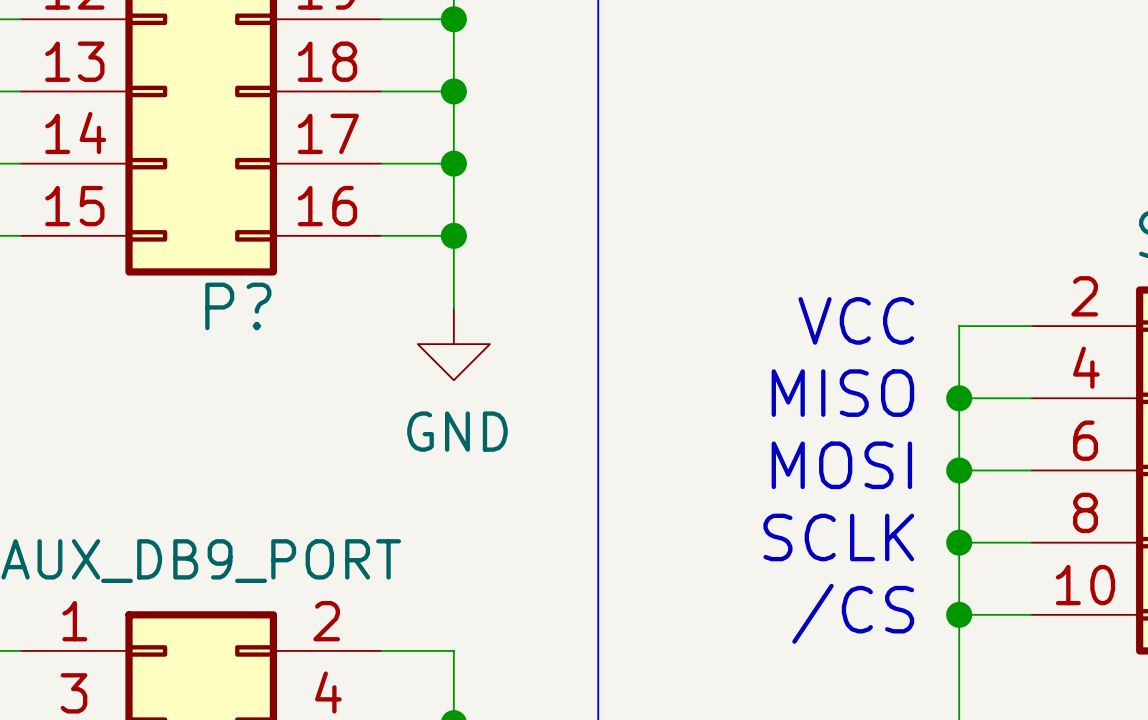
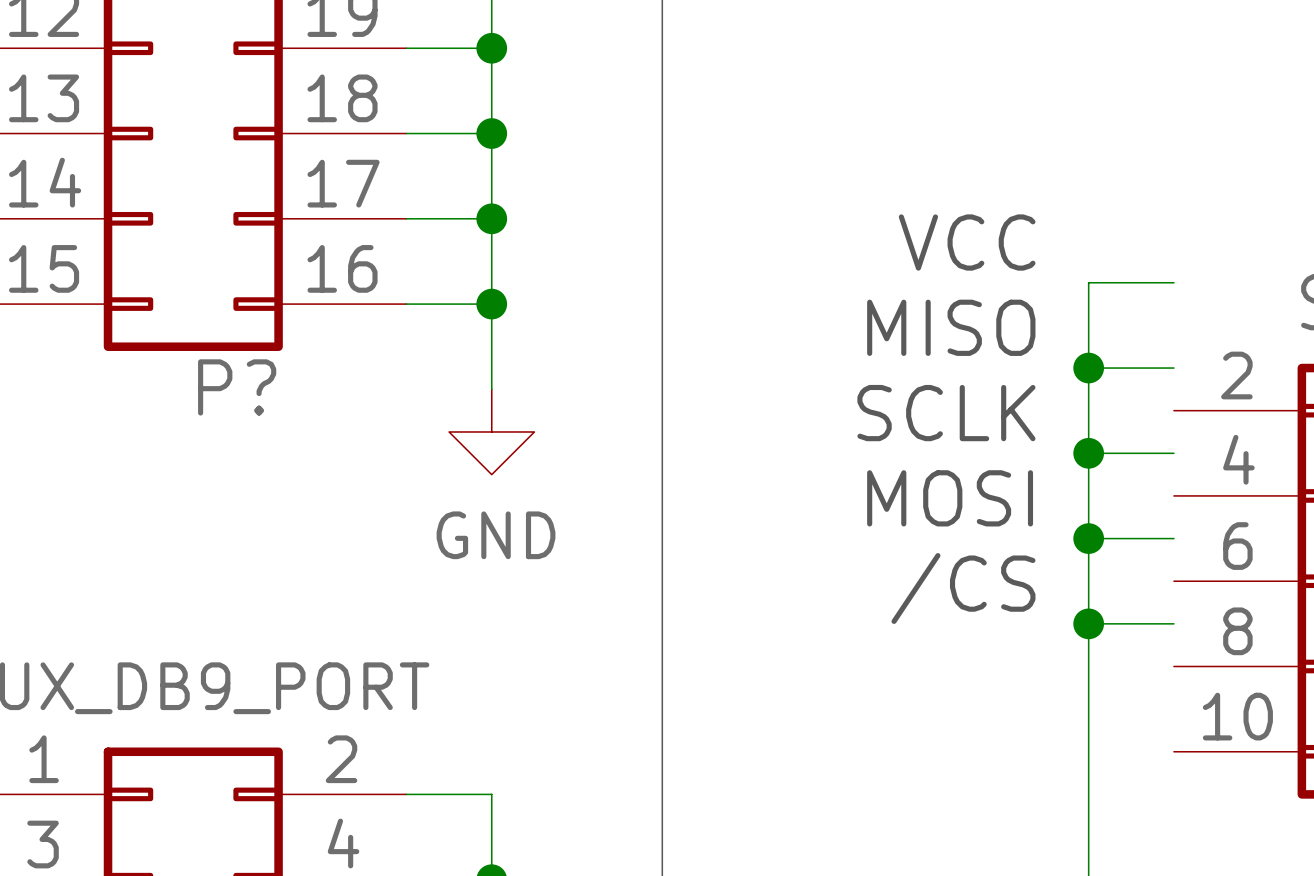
junction: none -> (1088, 368)
text position: VCC (856, 320) -> VCC (967, 242)
wire: (959, 326) (1031, 326) -> (1088, 410) (1088, 282) (1173, 282)
junction: none -> (1088, 453)
text position: MISO (842, 393) -> MISO (951, 327)
wire: (959, 398) (1031, 398) -> (1088, 538) (1173, 538)
junction: (959, 398) -> none
junction: none -> (1088, 538)
text position: MOSI (841, 465) -> MOSI (950, 498)
wire: (959, 470) (1031, 470) -> (1088, 623) (1173, 623)
junction: (959, 470) -> none
junction: none -> (1088, 623)
text position: SCLK (838, 537) -> SCLK (946, 413)
wire: (959, 542) (1031, 542) -> (1088, 453) (1173, 453)
junction: (959, 542) -> none
text position: /CS (853, 613) -> /CS (963, 588)
wire: (959, 614) (1031, 614) -> (1088, 368) (1173, 368)
junction: (959, 614) -> none

